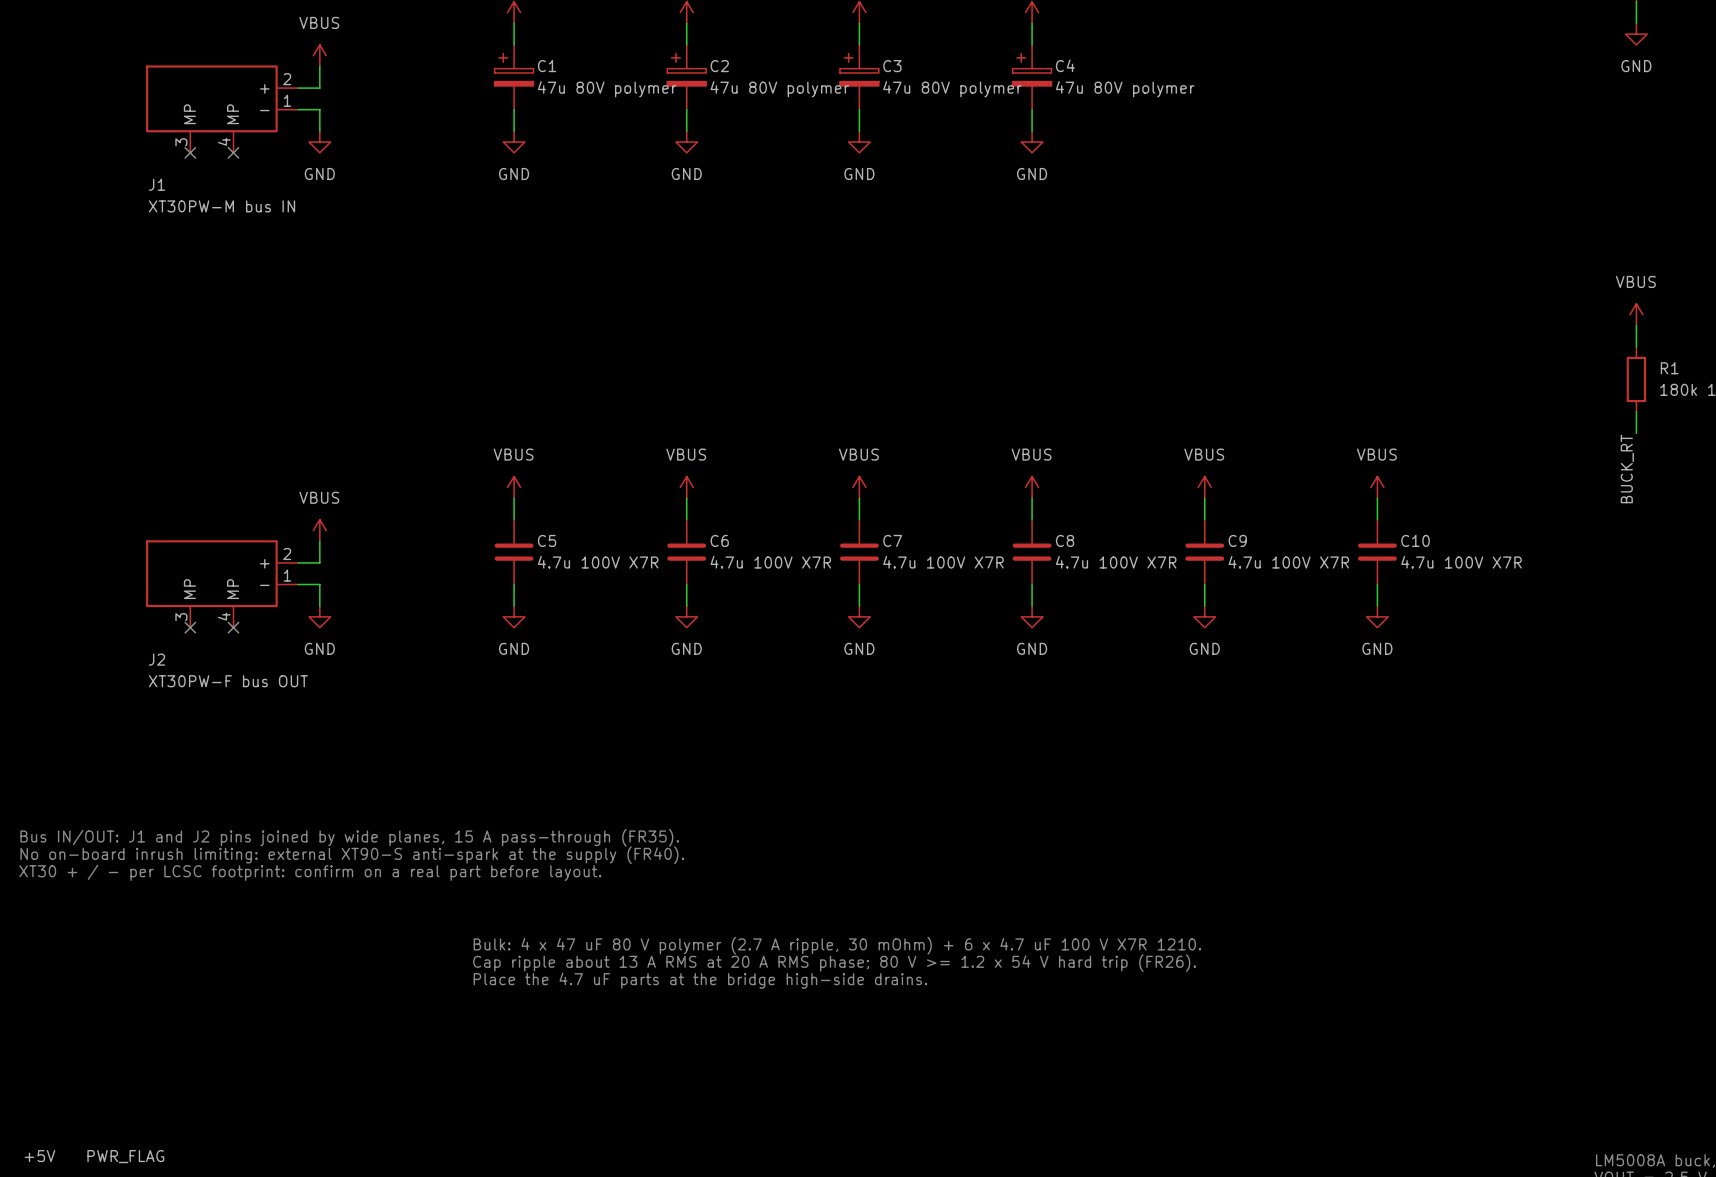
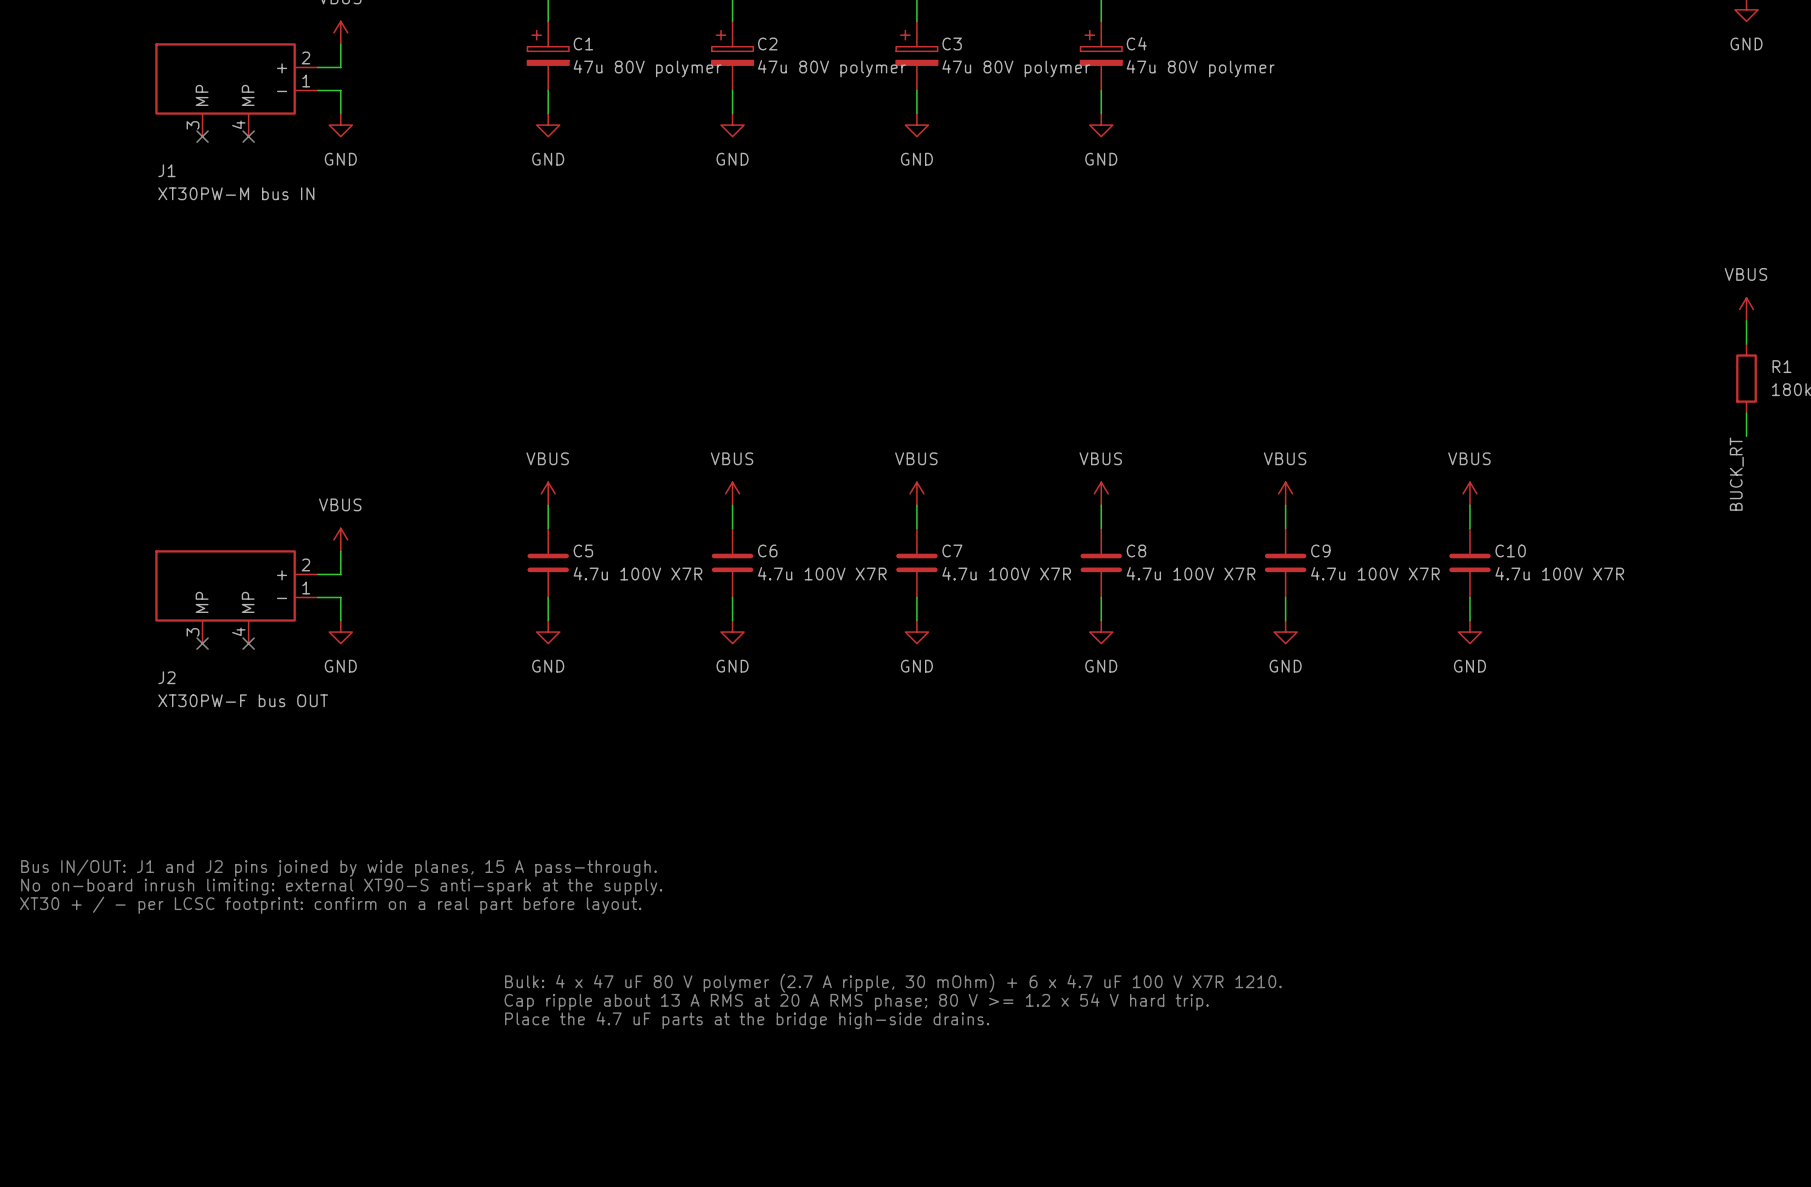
text: Bus IN/OUT: J1 and J2 pins joined by wide planes, 15 A pass-through (FR35). (349, 837) -> Bus IN/OUT: J1 and J2 pins joined by wide planes, 15 A pass-through. (338, 868)
text: No on-board inrush limiting: external XT90-S anti-spark at the supply (FR40). (352, 855) -> No on-board inrush limiting: external XT90-S anti-spark at the supply. (341, 887)
text: Cap ripple about 13 A RMS at 20 A RMS phase; 80 V >= 1.2 x 54 V hard trip (FR26). (834, 963) -> Cap ripple about 13 A RMS at 20 A RMS phase; 80 V >= 1.2 x 54 V hard trip. (856, 1001)

